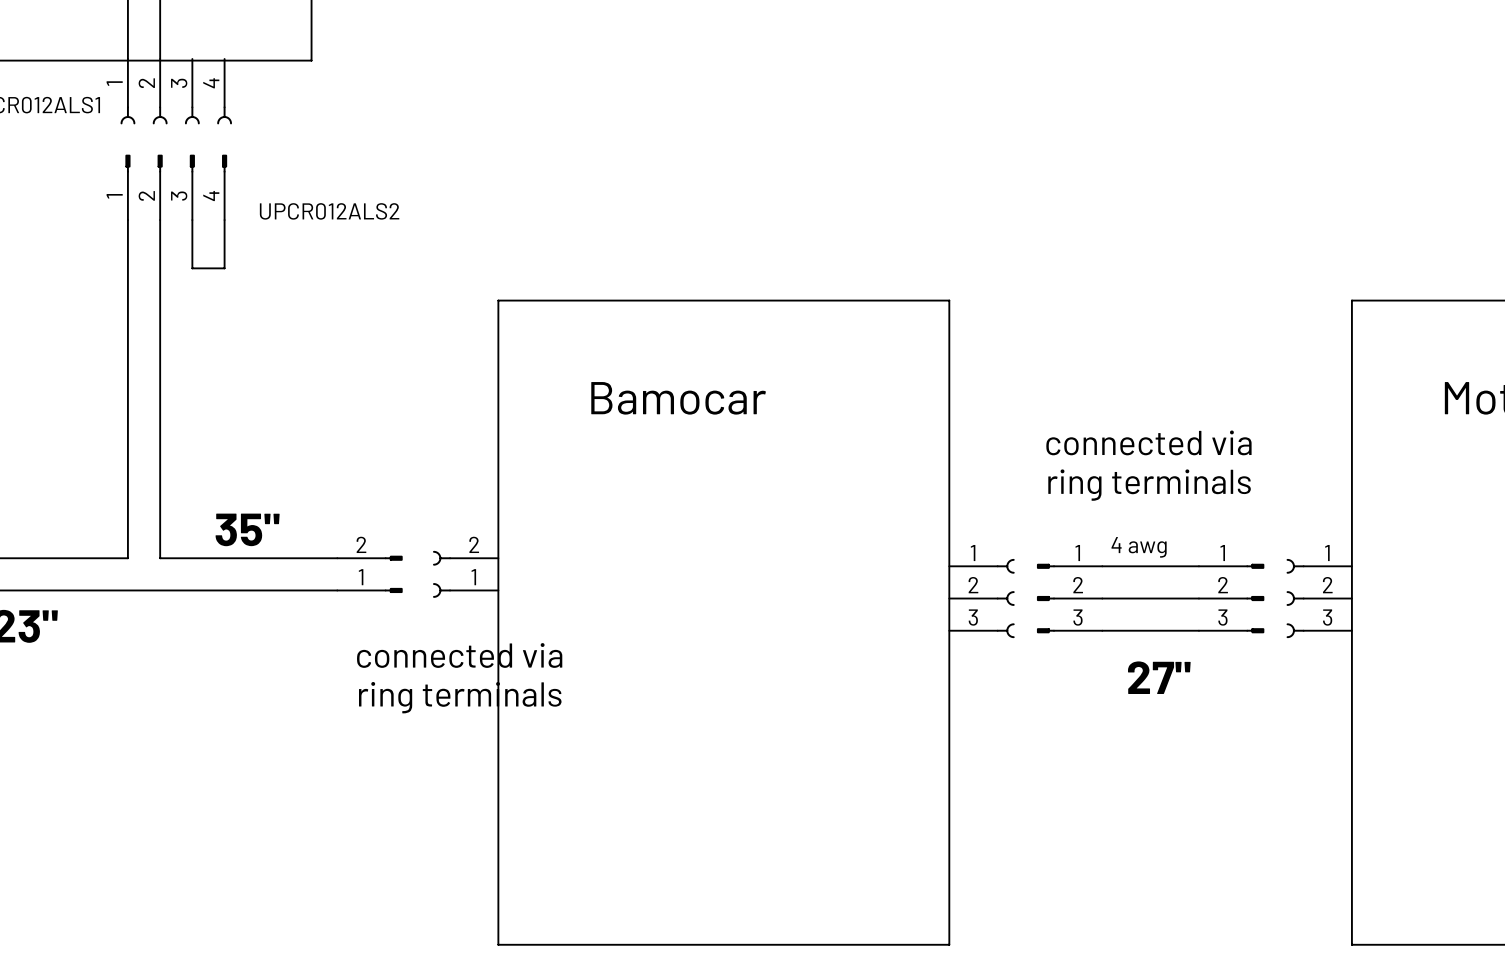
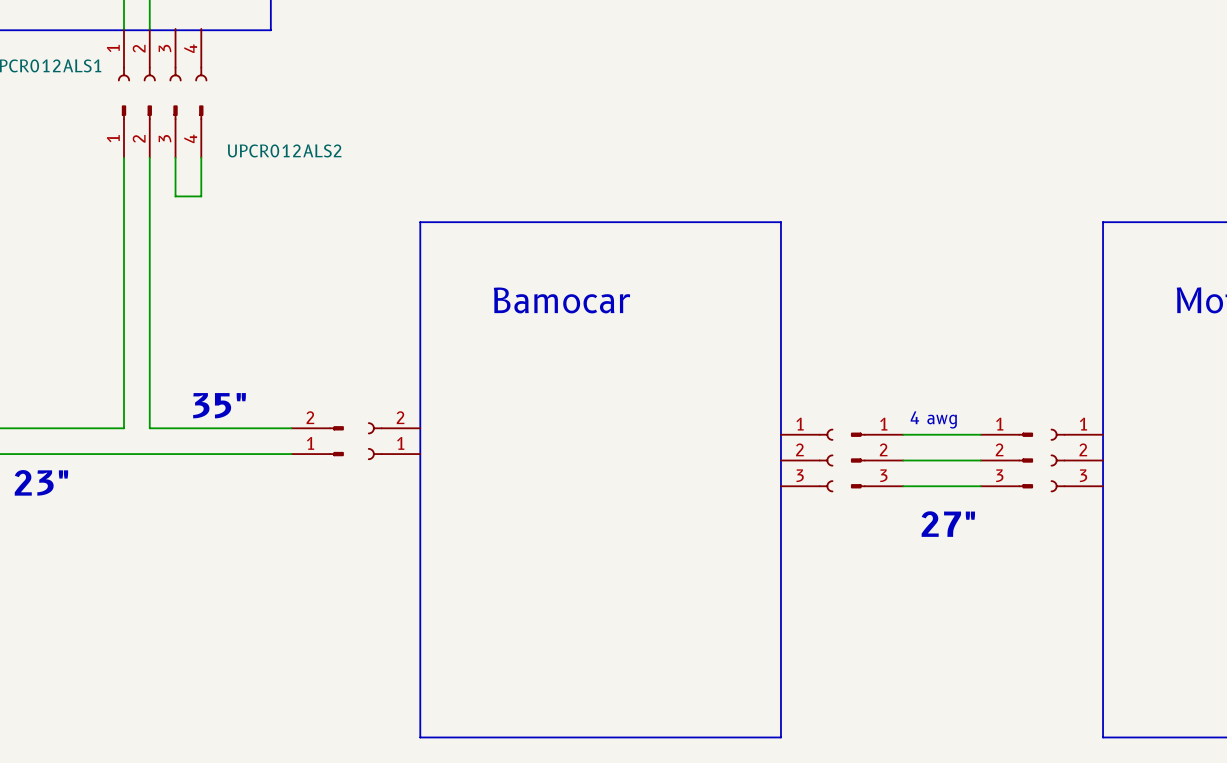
text: connected via (1148, 442) -> none
text: ring terminals (1149, 485) -> none
text: connected via (459, 655) -> none
text: ring terminals (460, 697) -> none

